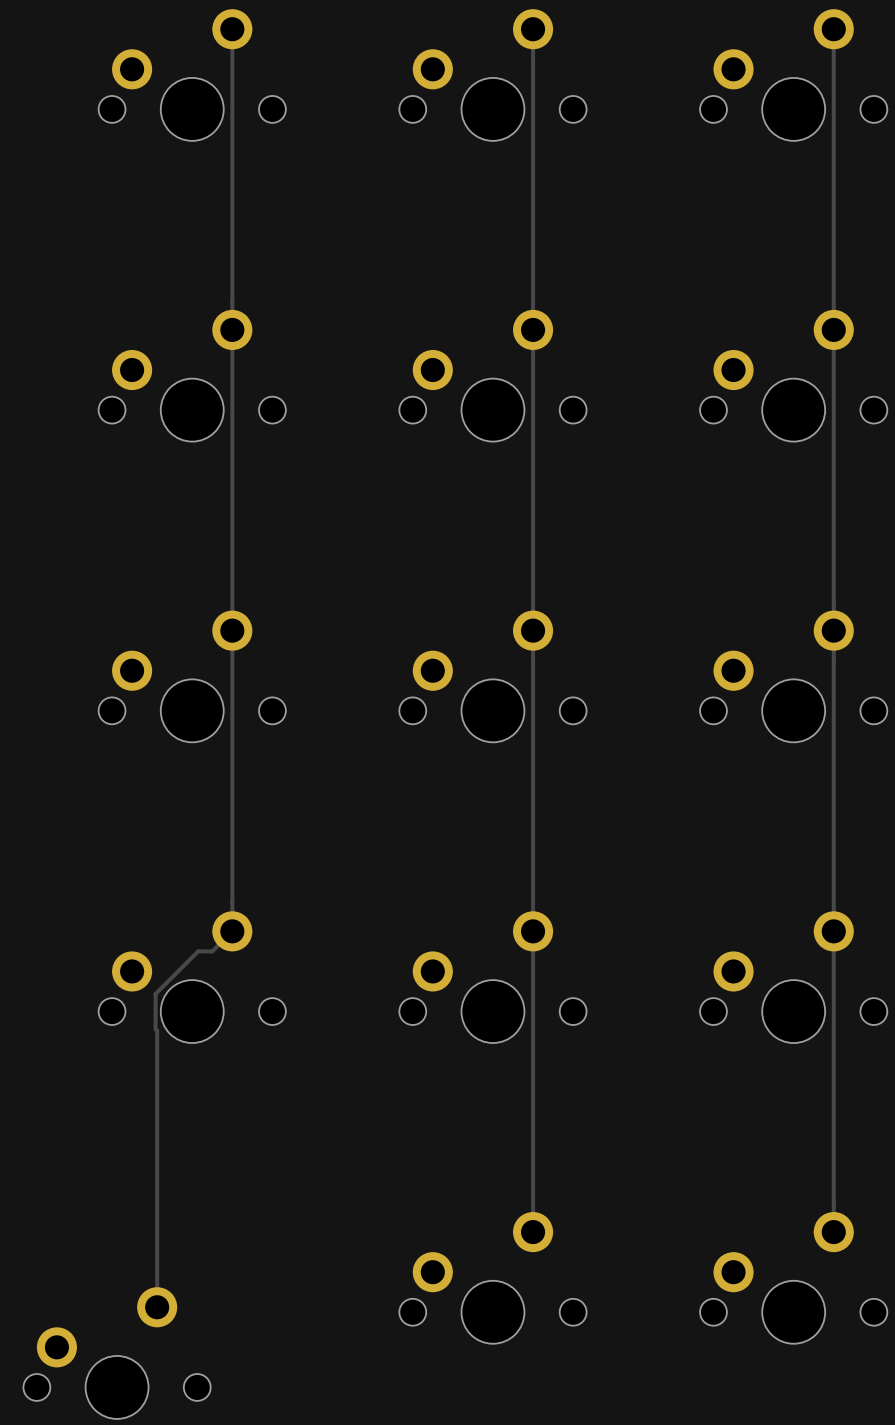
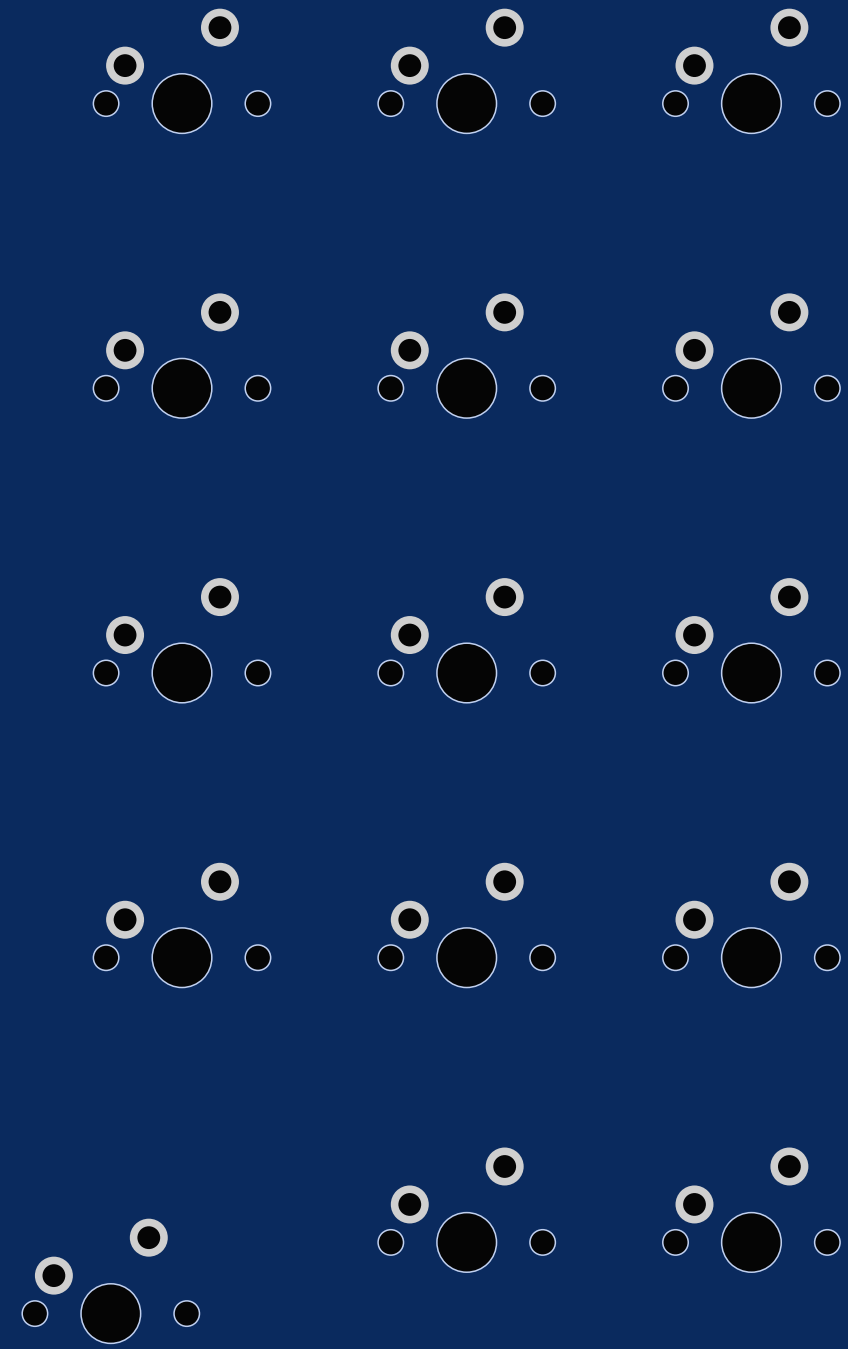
track: (232, 29) (232, 931) (212, 951) (198, 951) (155, 993) (157, 1307) -> none
track: (533, 29) (533, 1232) -> none
track: (833, 29) (833, 1232) -> none

